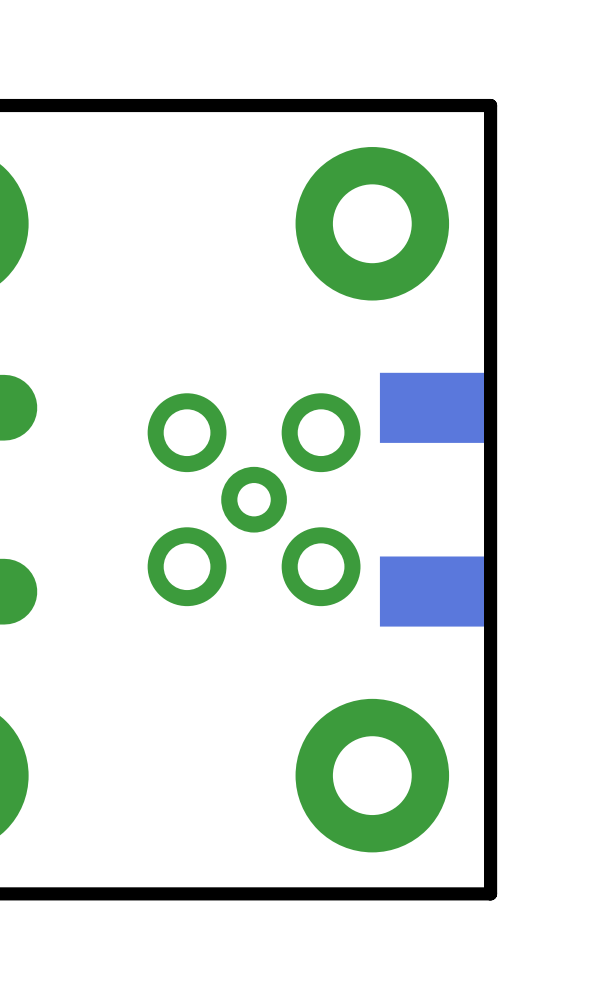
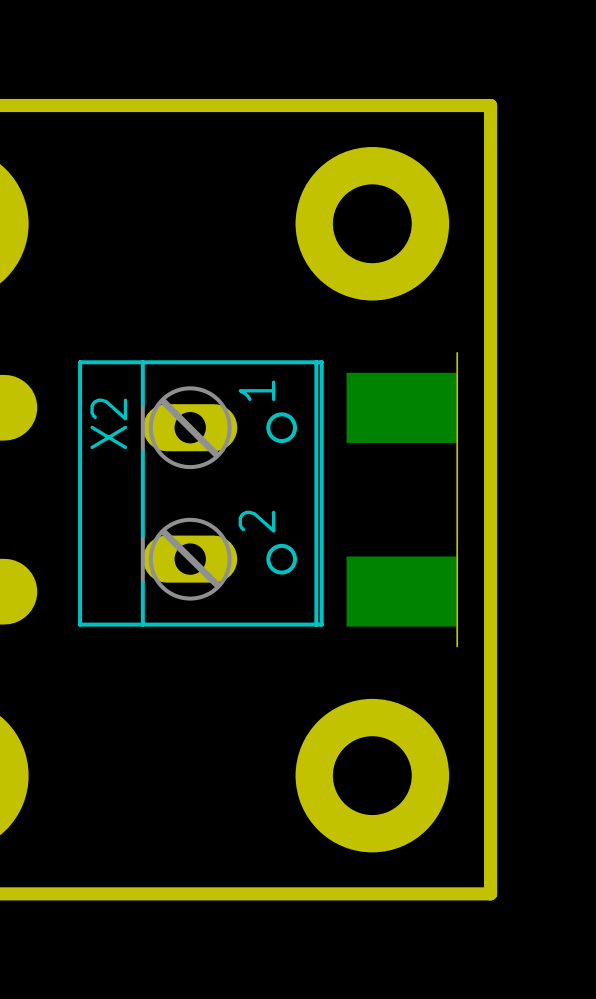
X2: none -> (200, 493)
part: (254, 499) -> none
part position: (435, 499) -> (401, 499)

